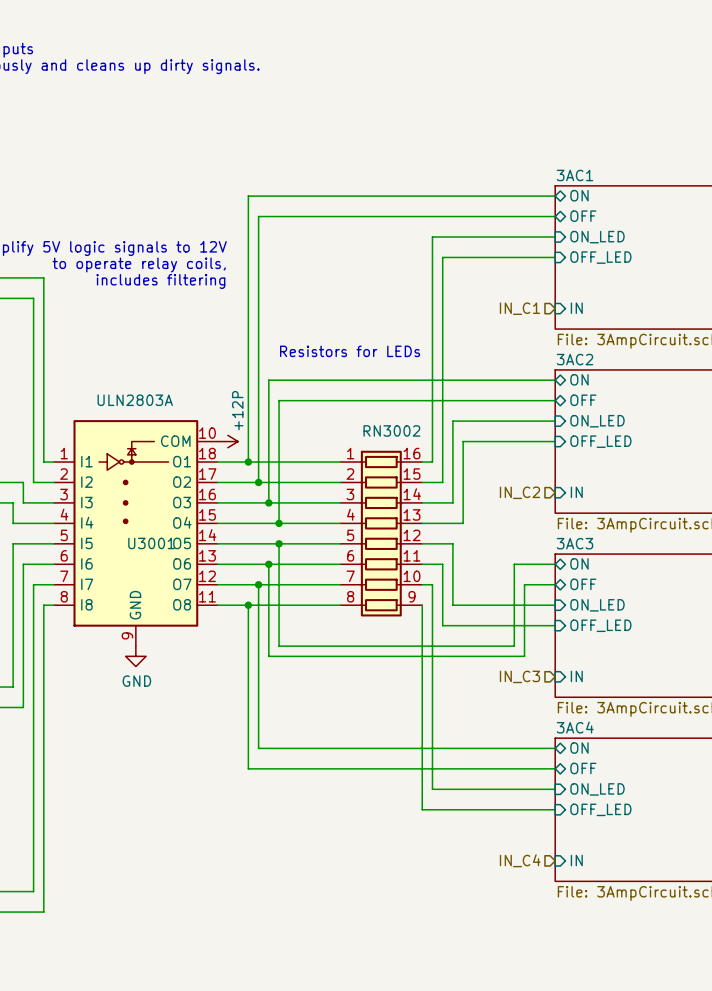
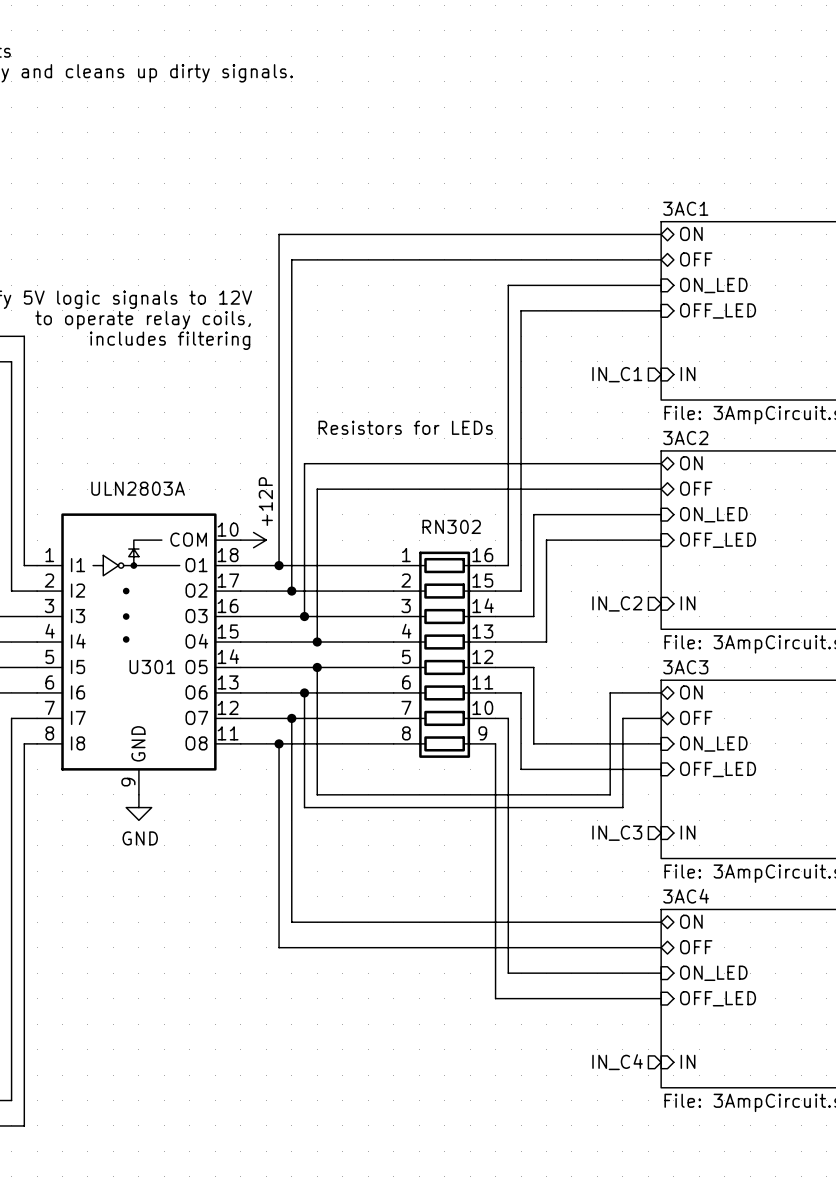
RN3002 name: RN3002 (391, 430) -> RN302 (451, 526)
U3001 name: U3001 (151, 543) -> U301 (152, 667)

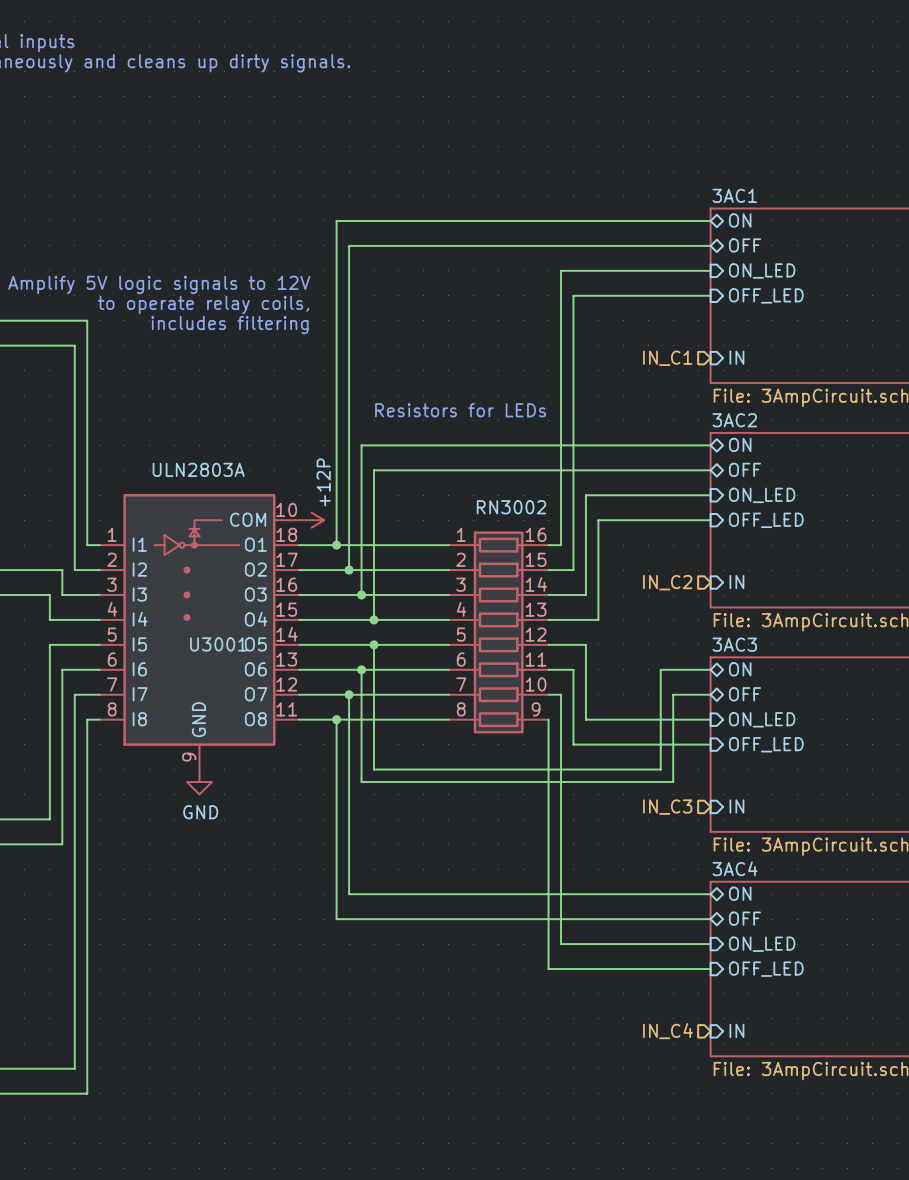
RN302 name: RN302 (451, 526) -> RN3002 (511, 507)
U301 name: U301 (152, 667) -> U3001 (218, 644)

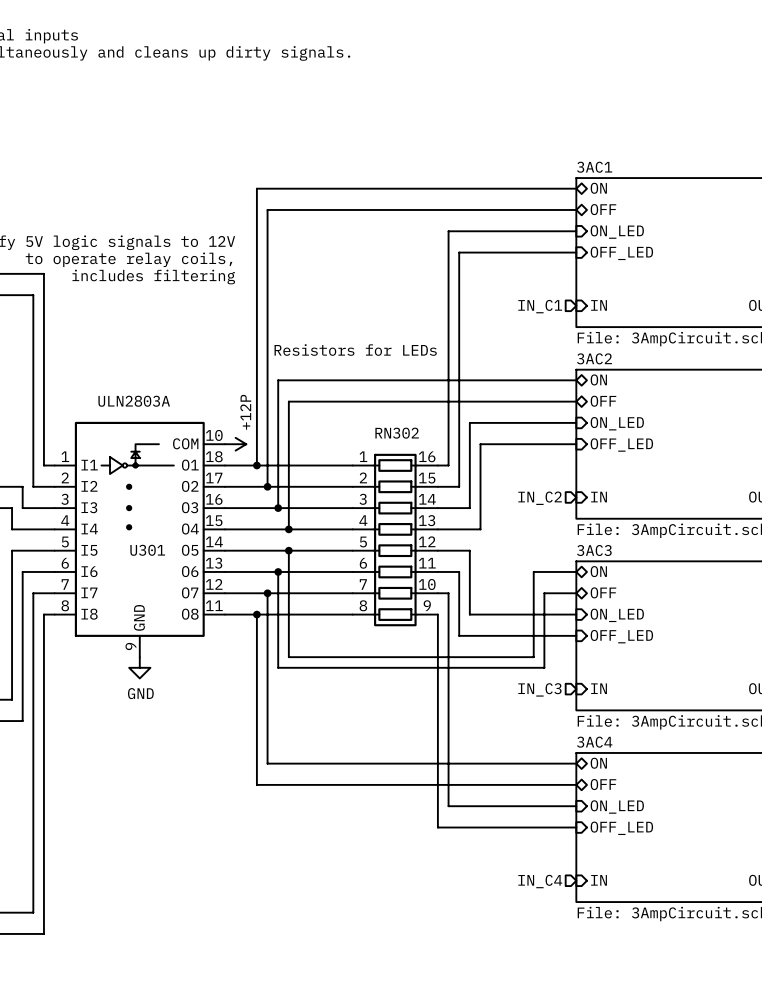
RN3002 name: RN3002 (511, 507) -> RN302 (397, 433)
U3001 name: U3001 (218, 644) -> U301 (147, 550)

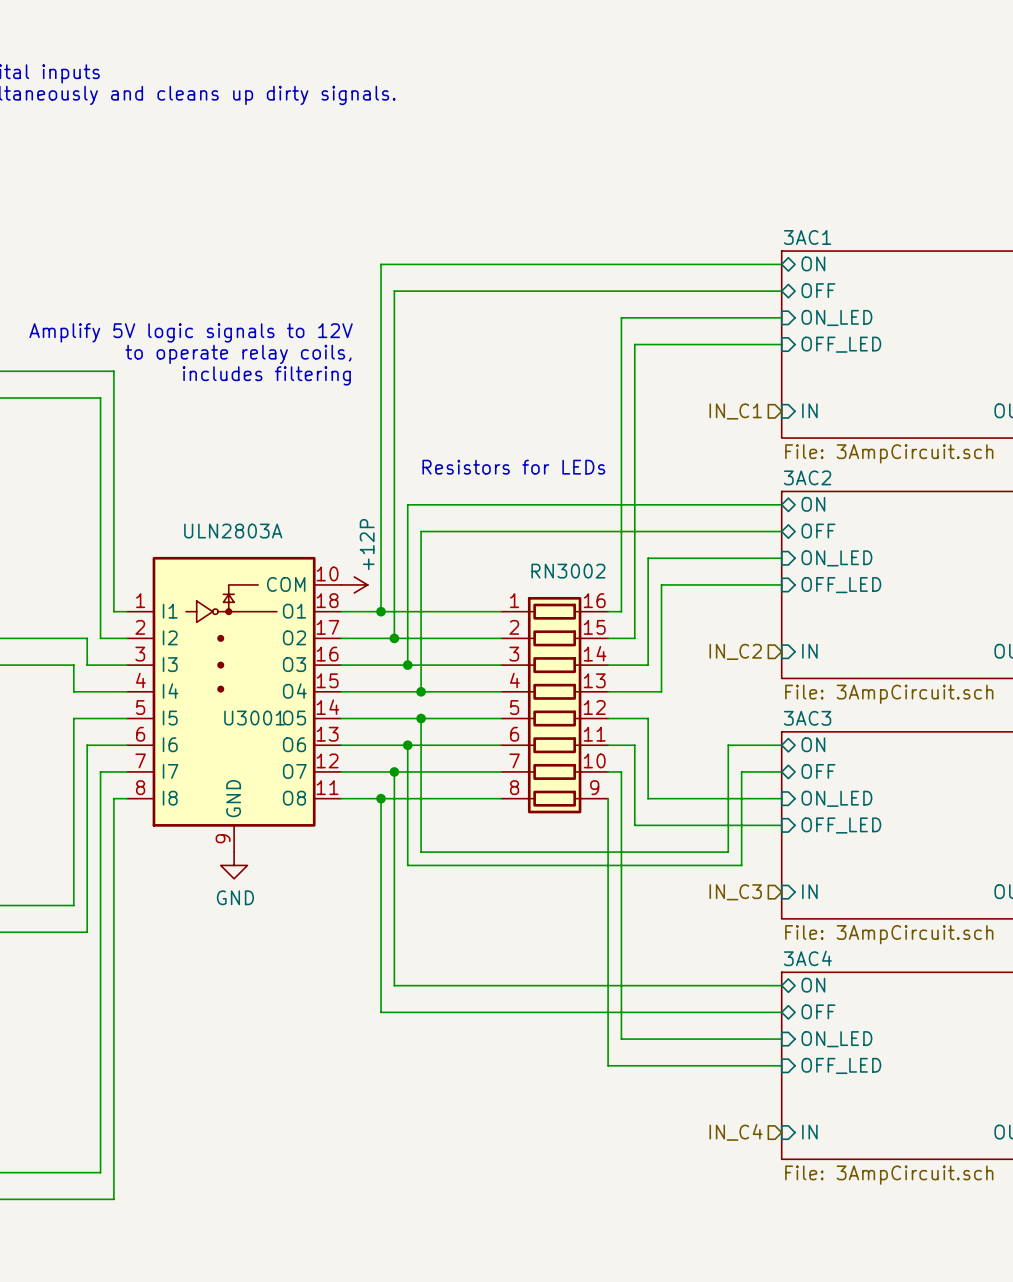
RN302 name: RN302 (397, 433) -> RN3002 (568, 571)
U301 name: U301 (147, 550) -> U3001 (254, 718)

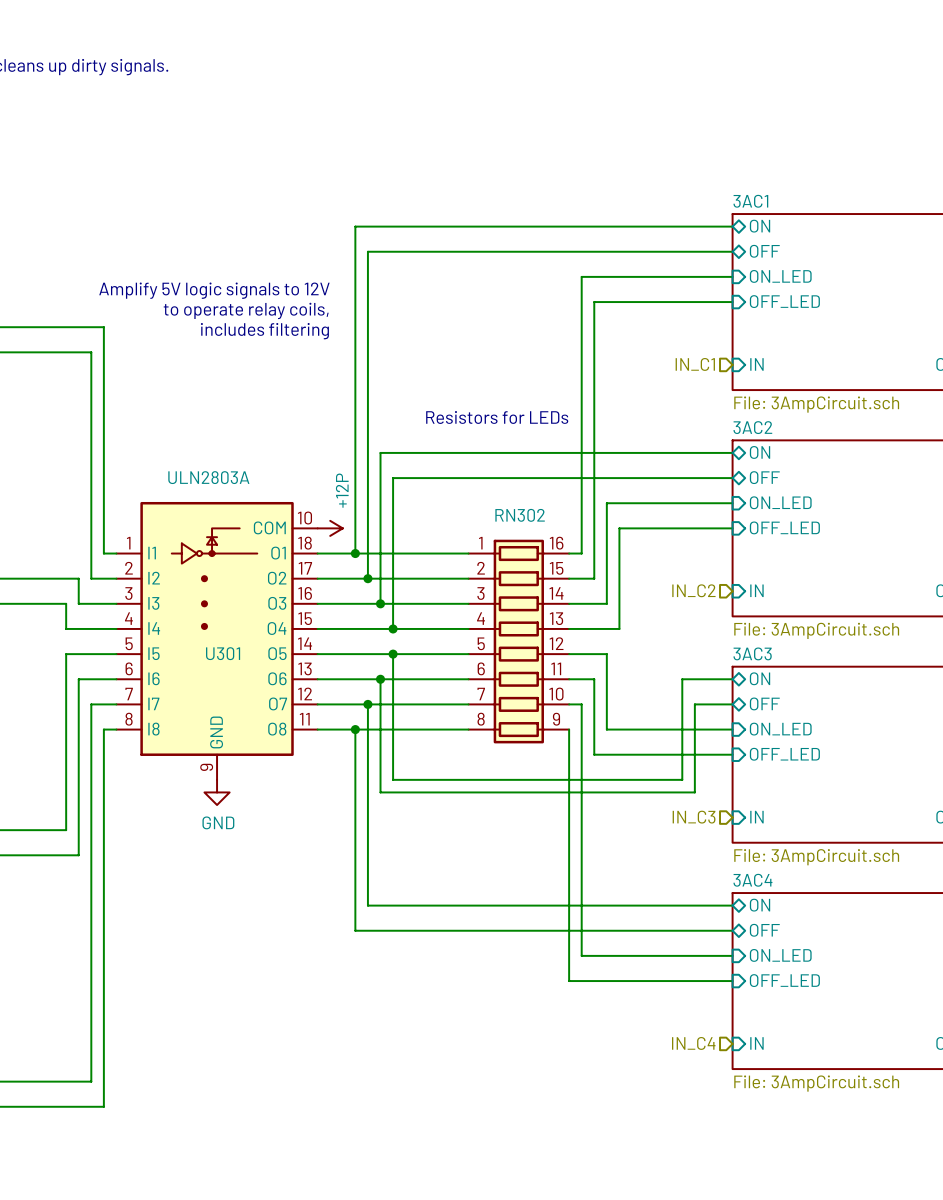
RN3002 name: RN3002 (568, 571) -> RN302 (520, 515)
U3001 name: U3001 (254, 718) -> U301 (223, 653)

